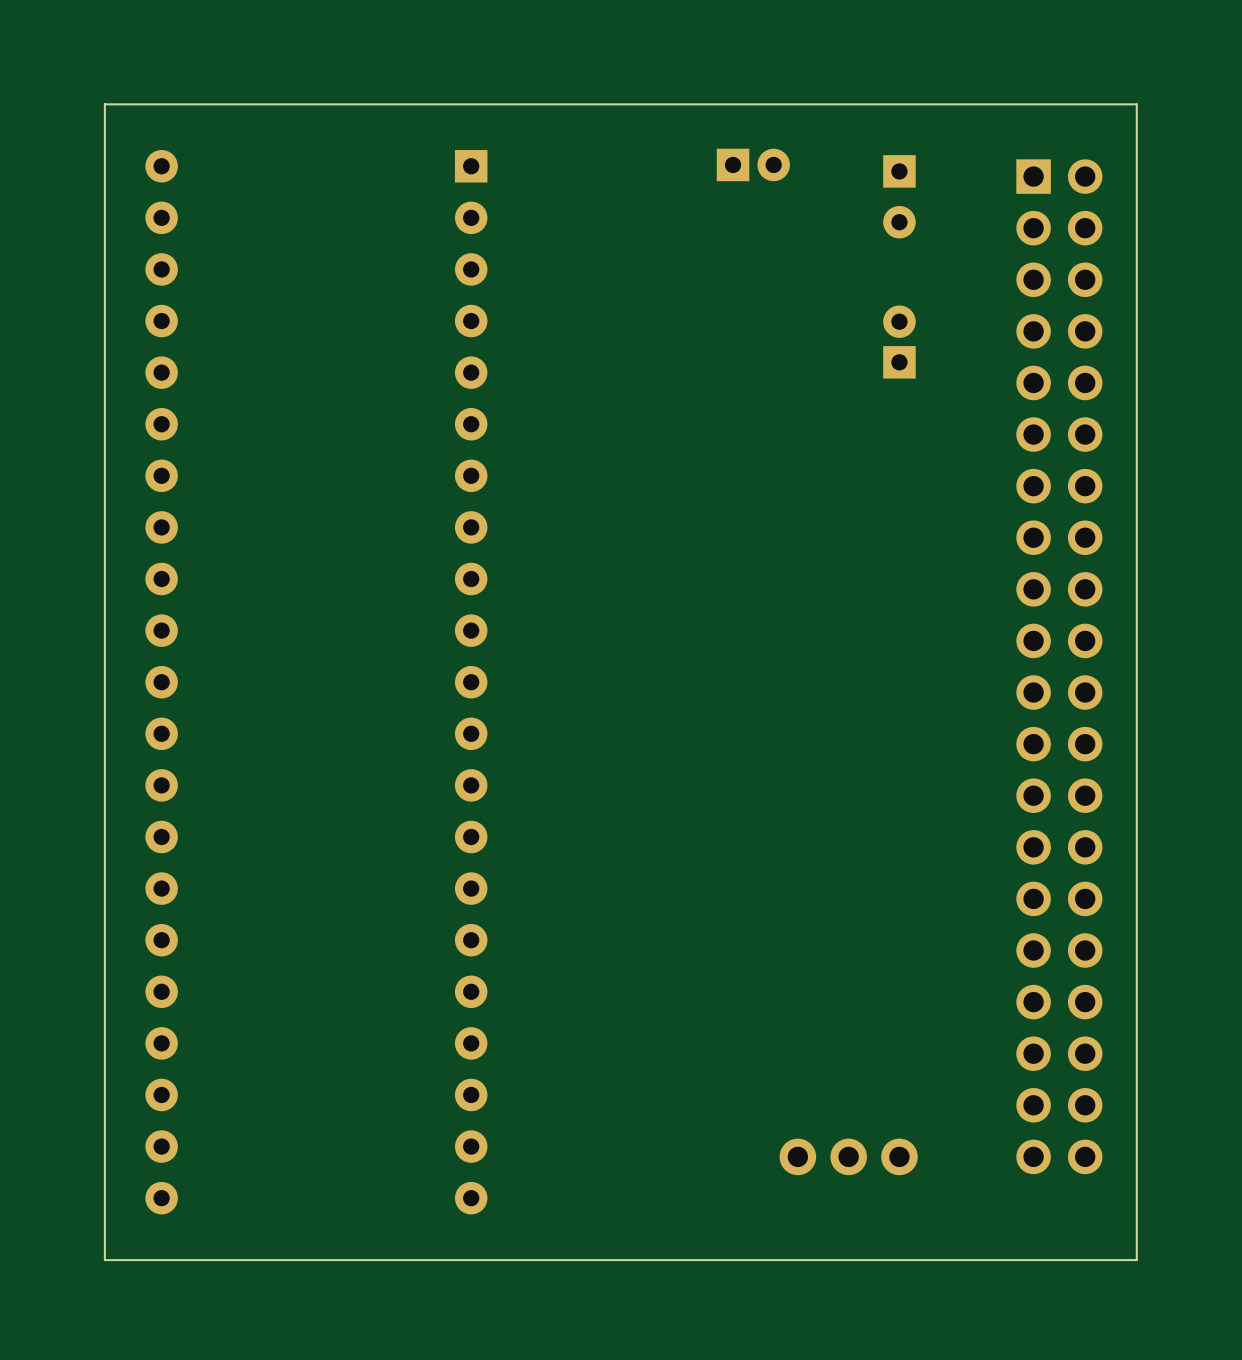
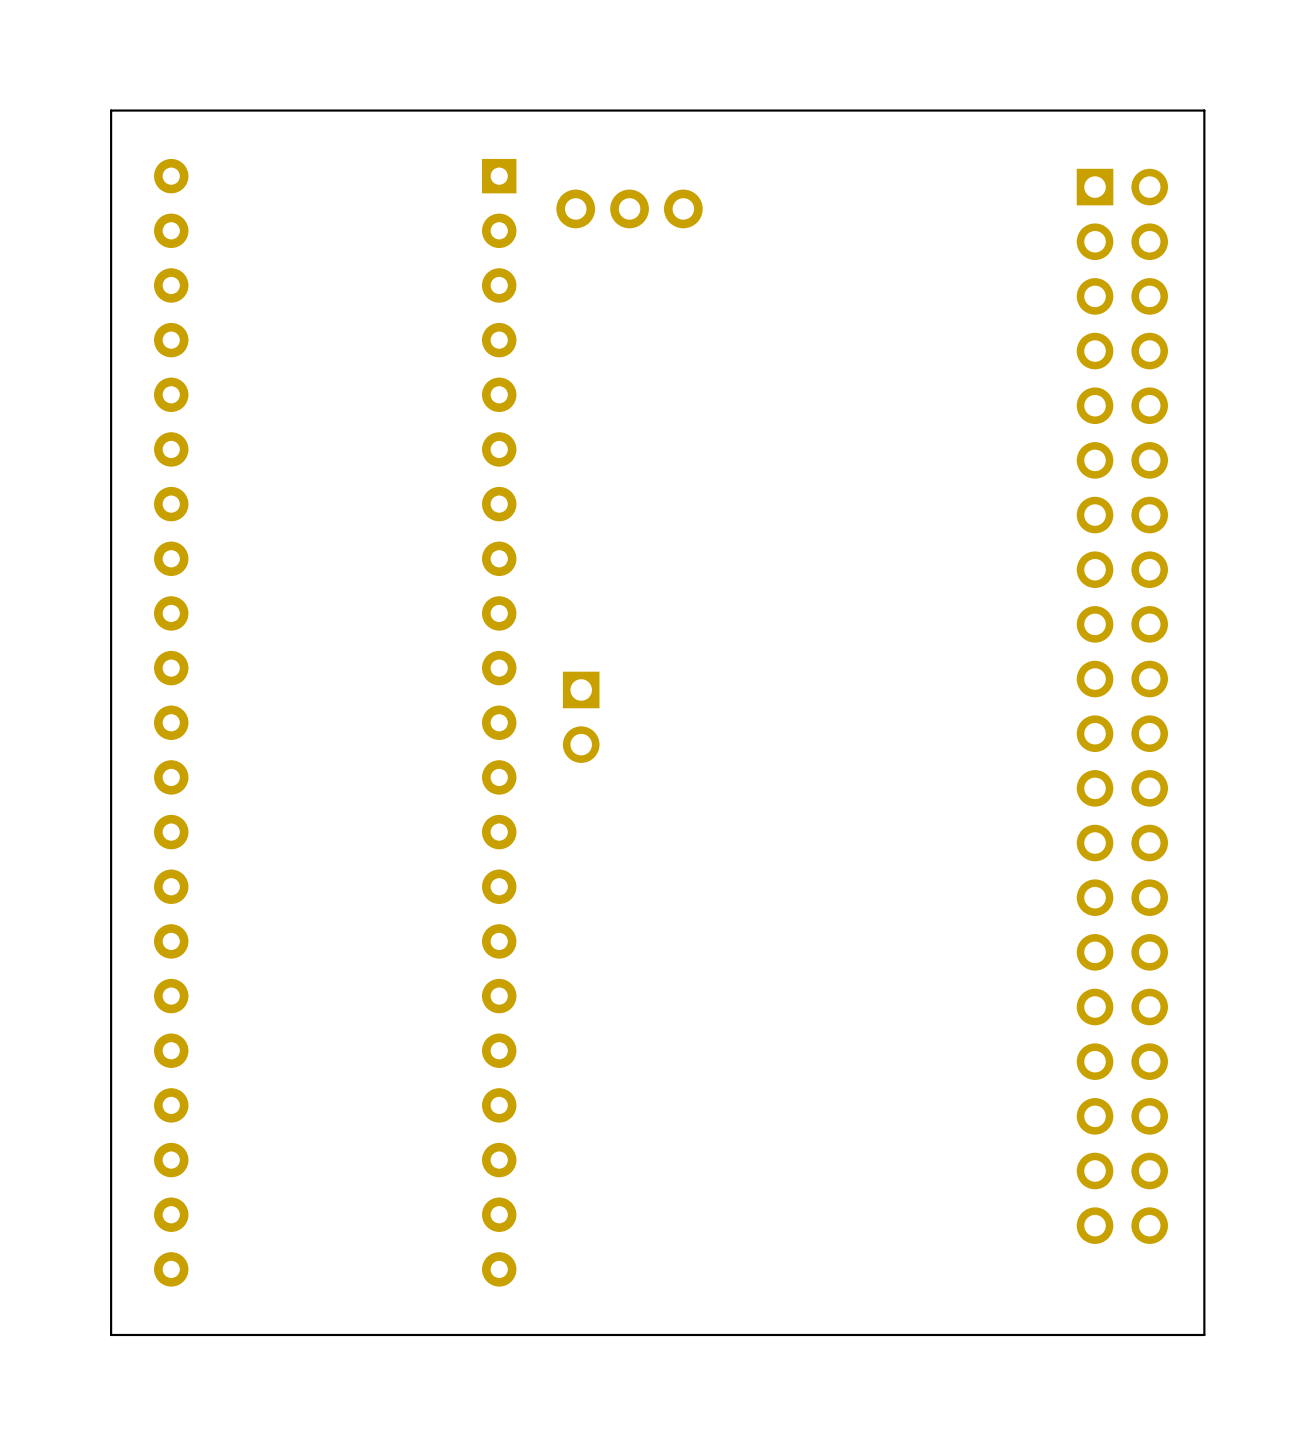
part: (753, 164) -> none
part: (899, 196) -> none
part: none -> (629, 208)
part: (899, 342) -> none
part: none -> (581, 717)
part: (848, 1156) -> none

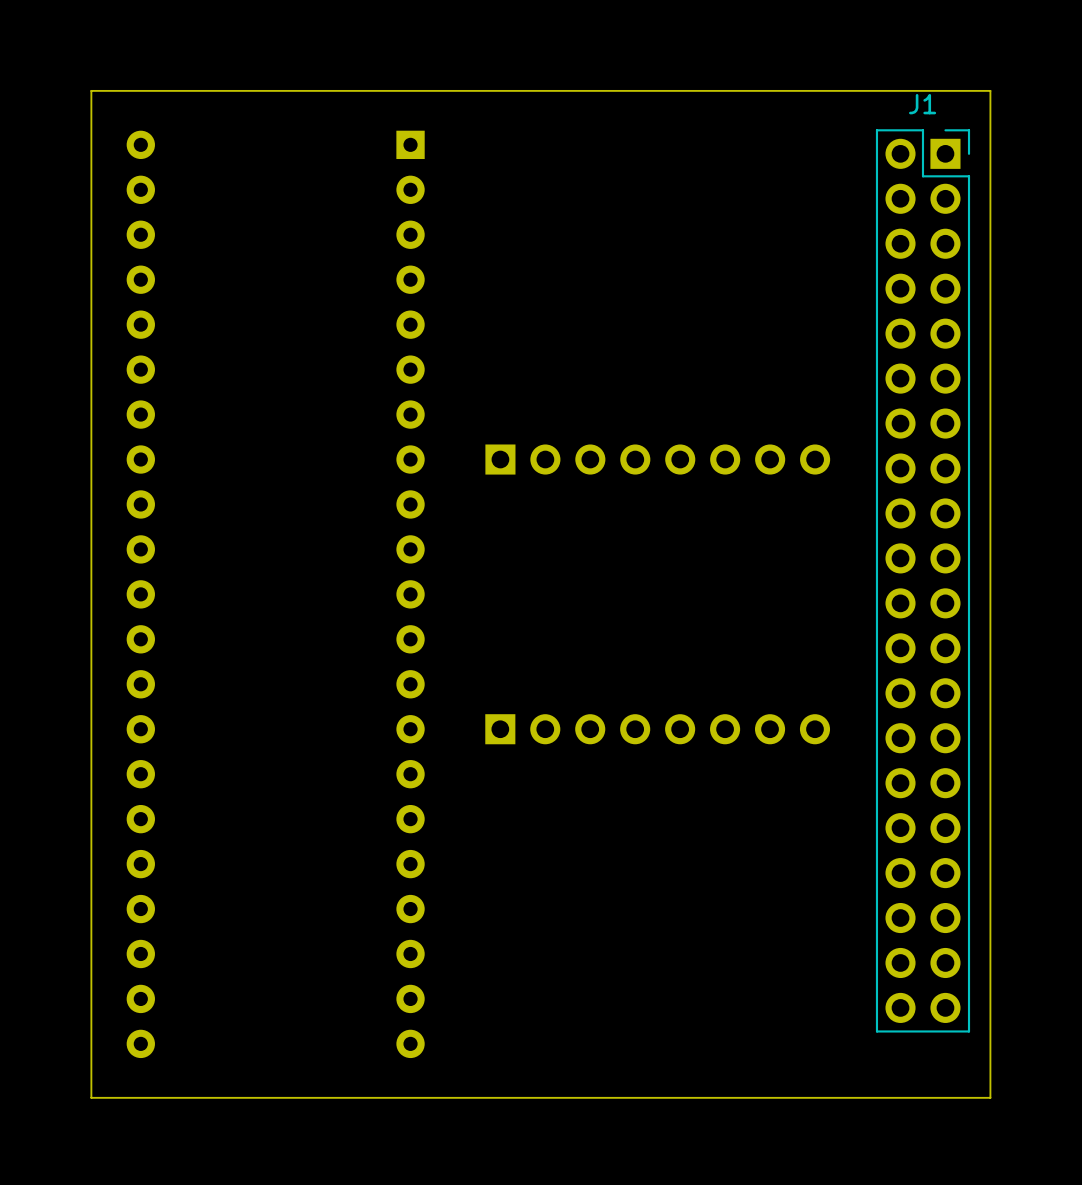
part: (629, 208) -> none
part: none -> (657, 459)
J1 side: top (1122, 706) -> bottom (922, 580)
part: (581, 717) -> none
part: none -> (657, 729)

